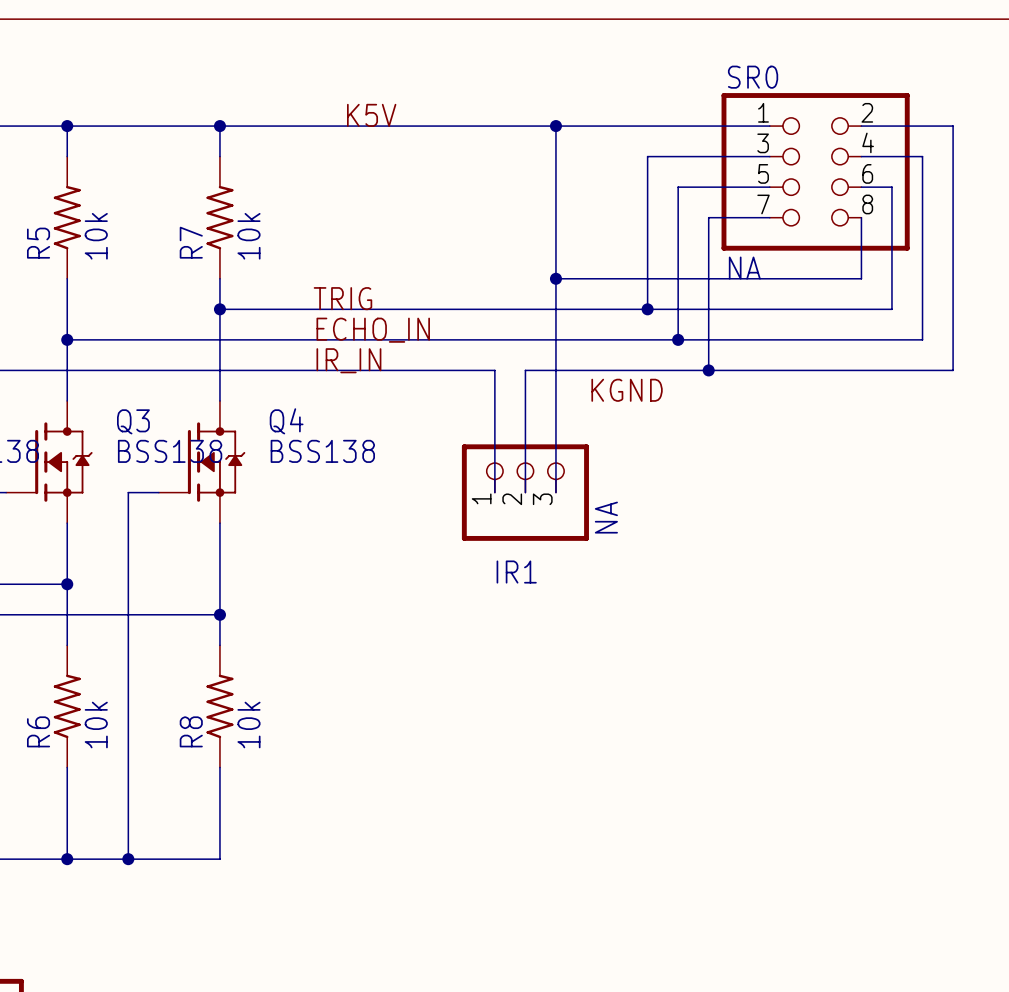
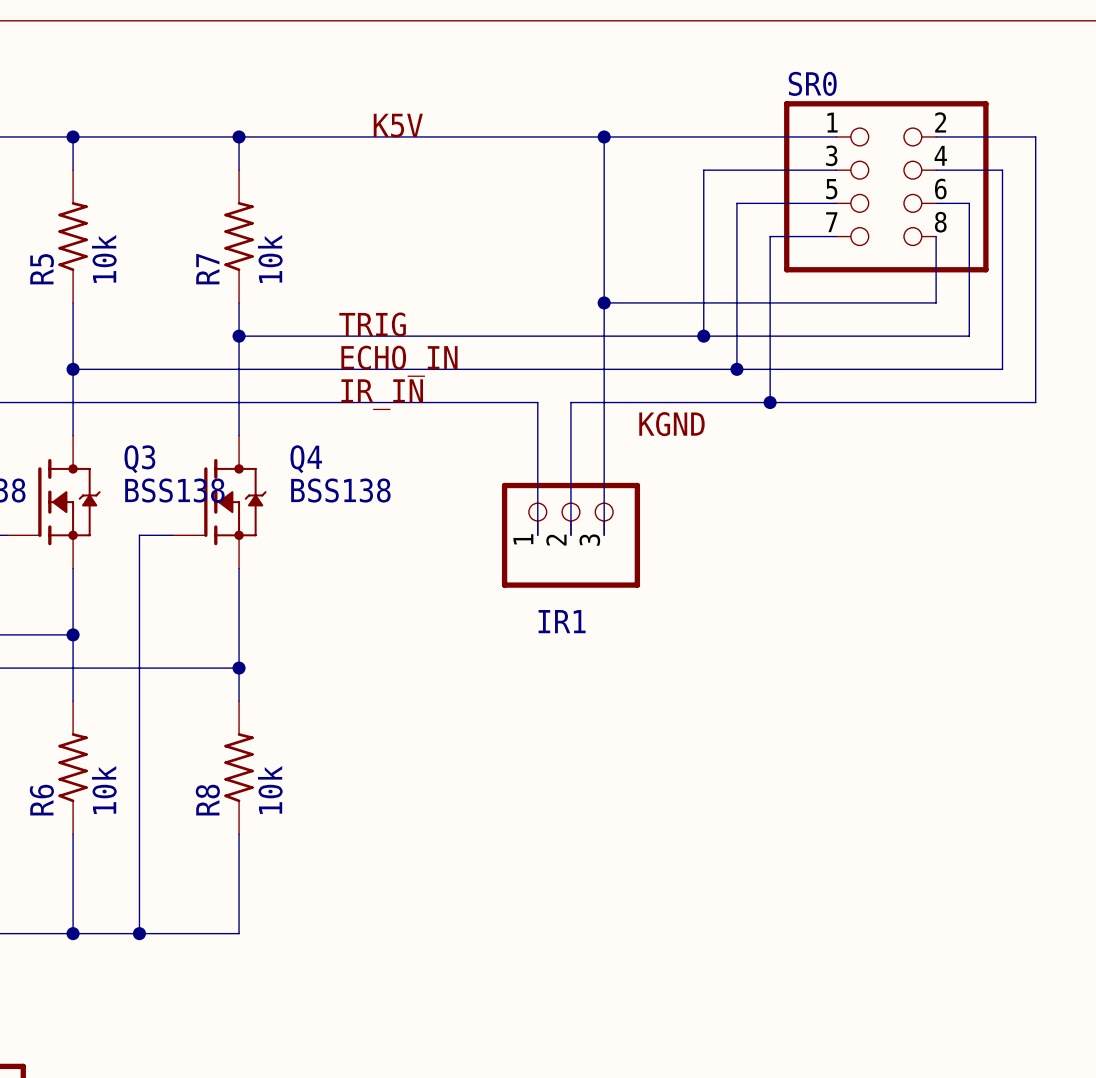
SR0 value: NA (744, 268) -> none
IR1 value: NA (606, 517) -> none

